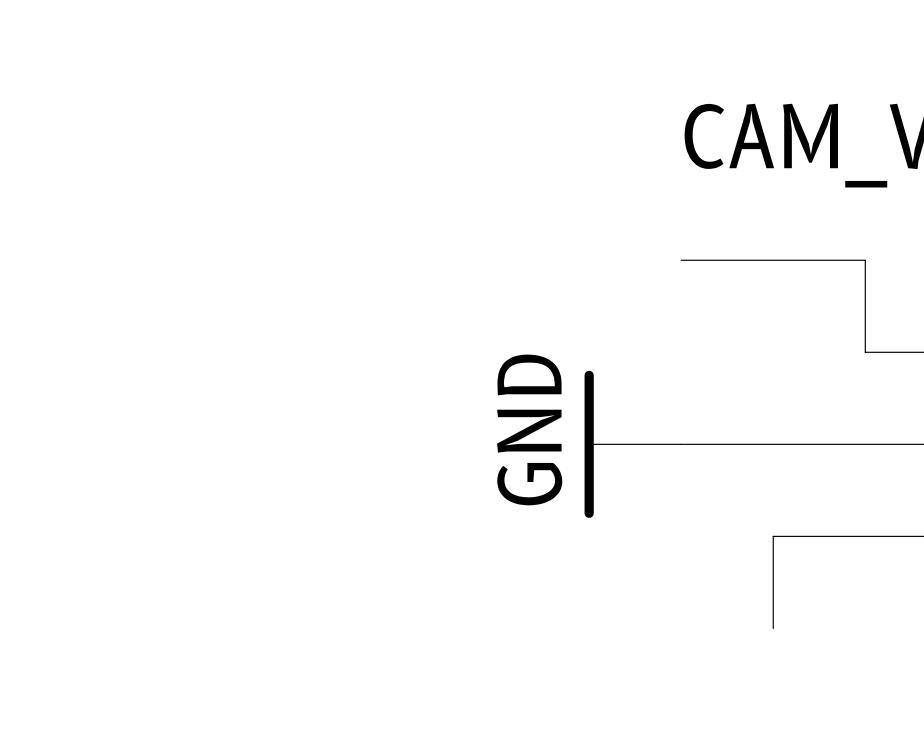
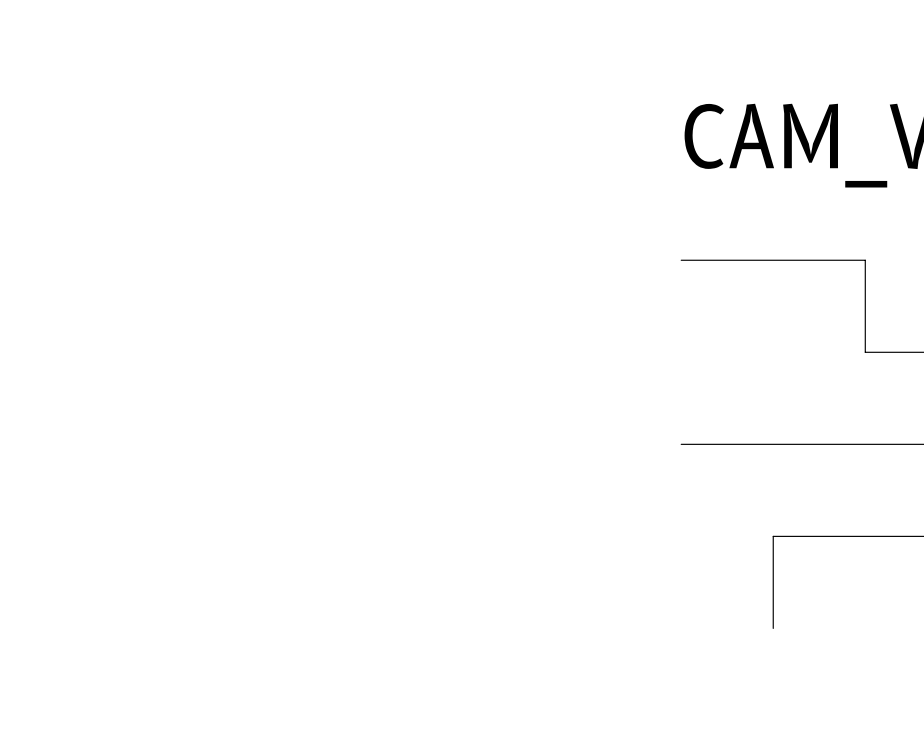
power symbol: GND (632, 444) -> none

